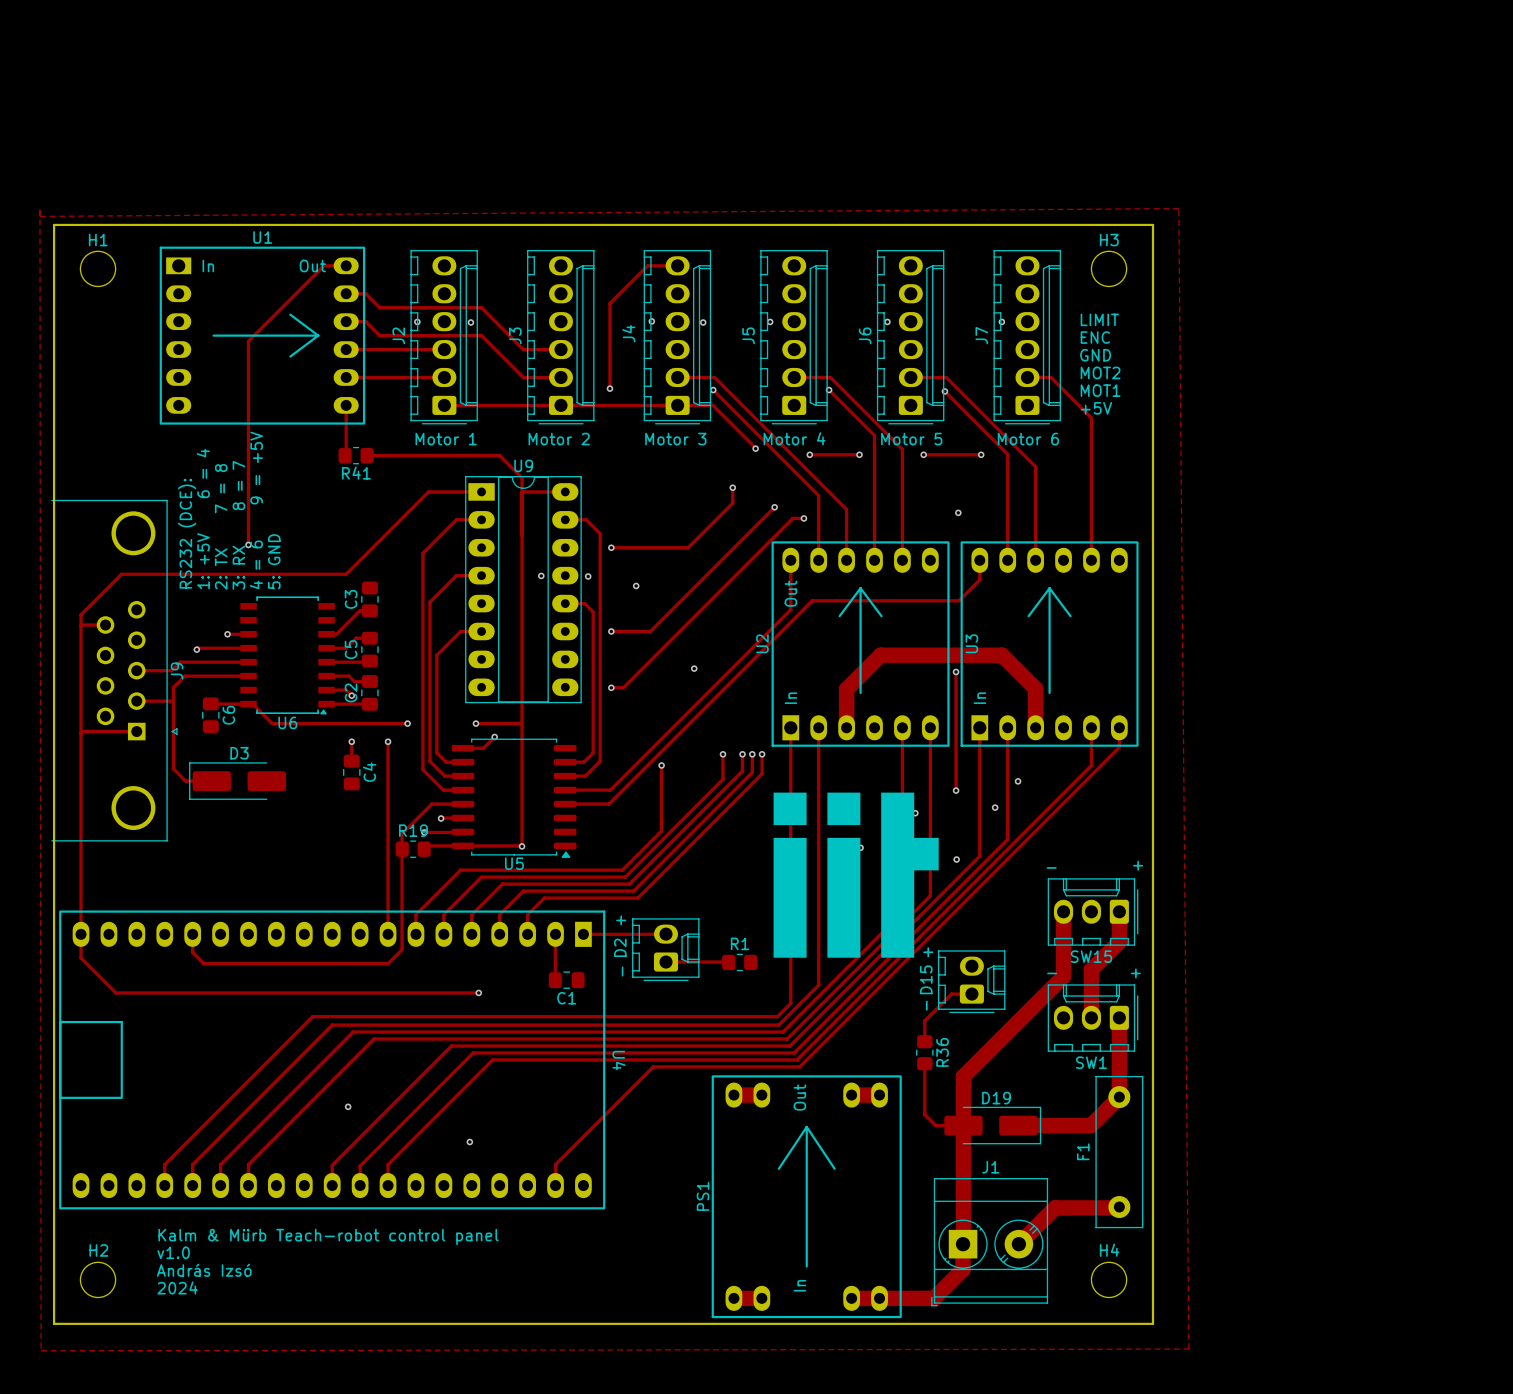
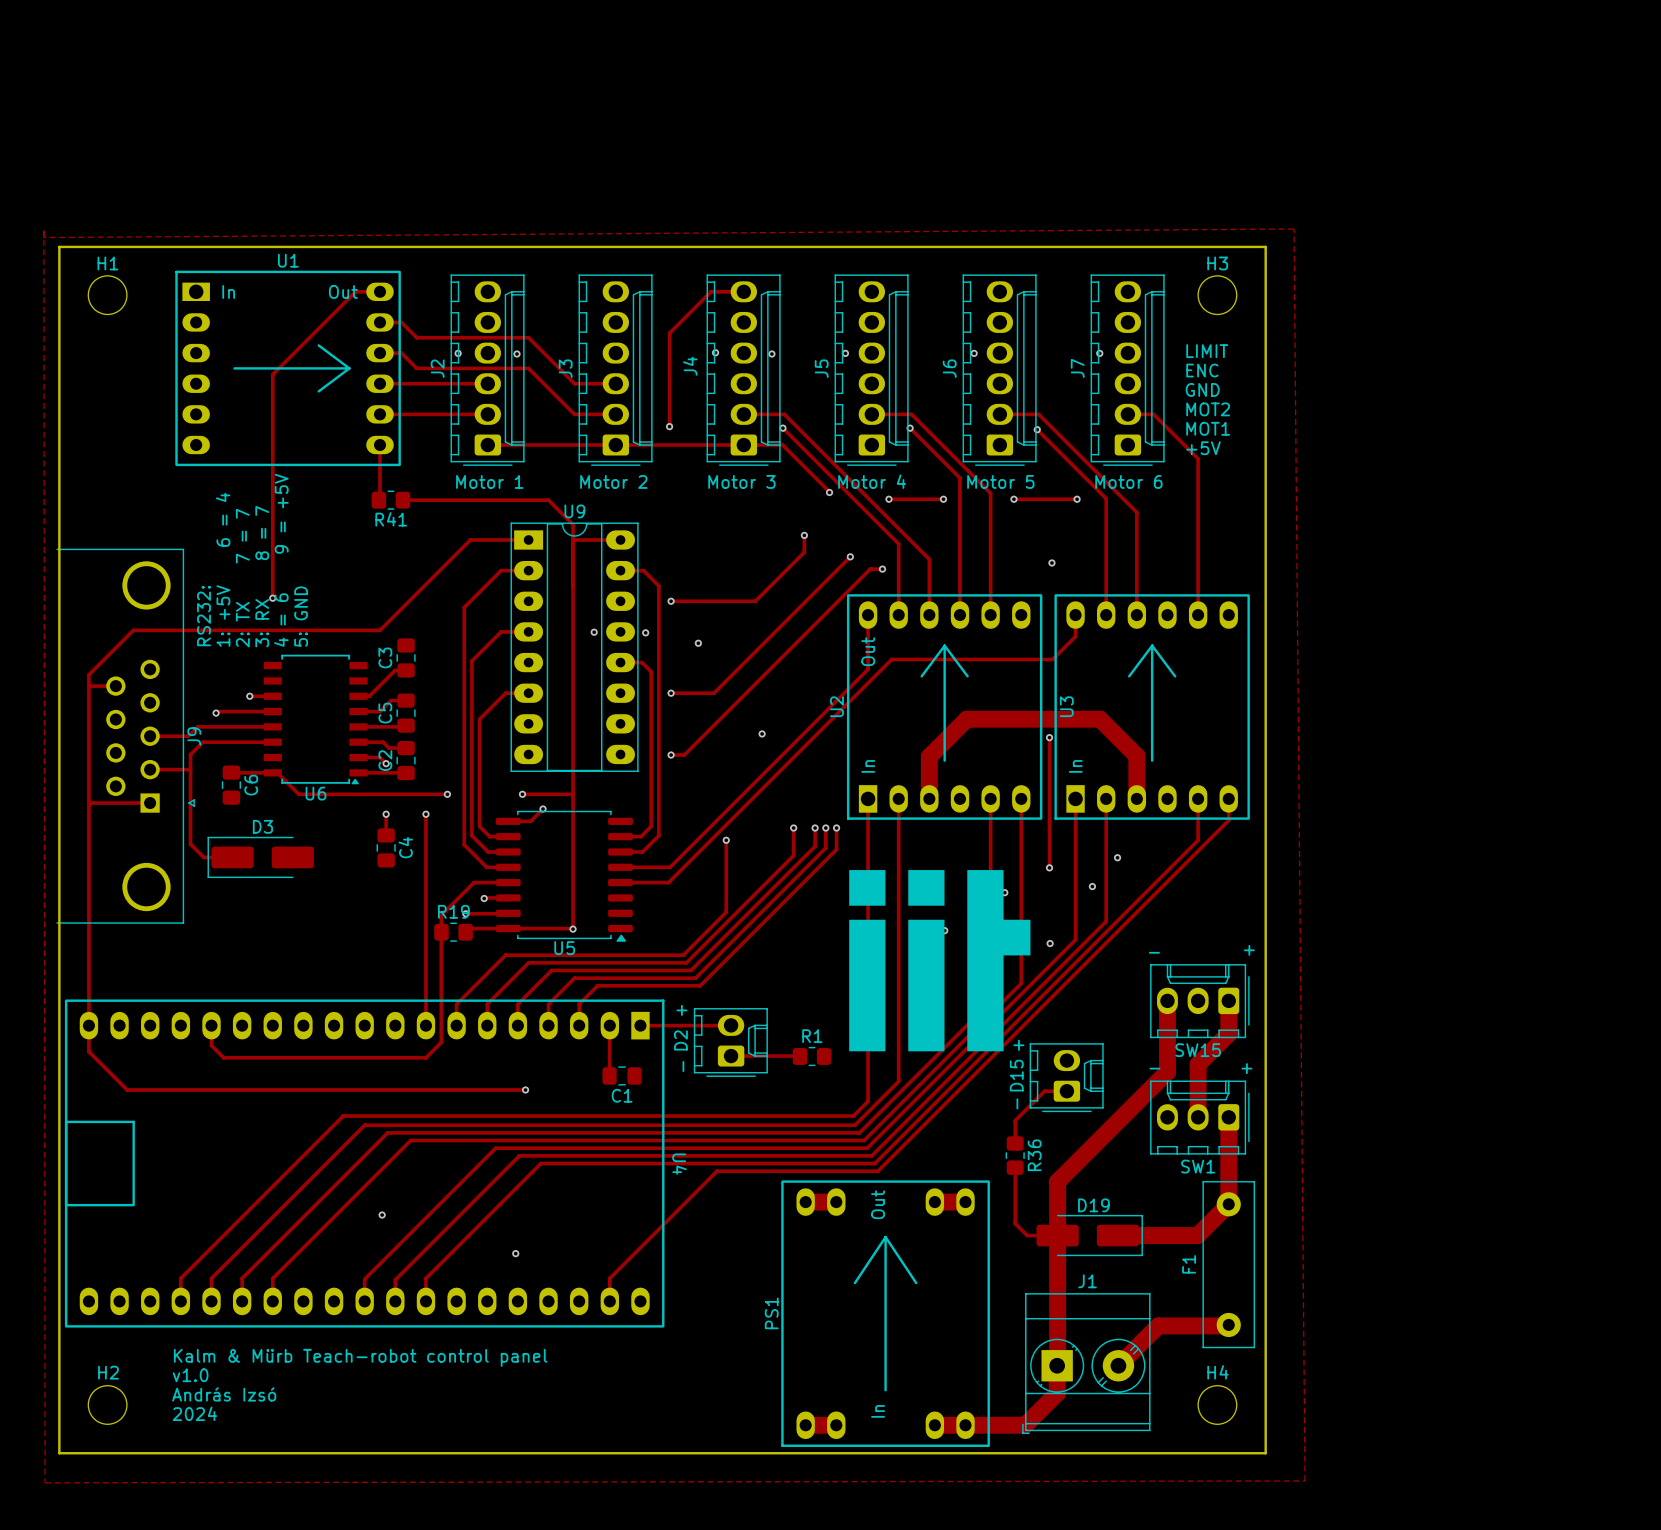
text: 2: TX 7 = 8 (221, 526) -> 2: TX 7 = 7 (242, 578)
text: RS232 (DCE): (187, 533) -> RS232: (204, 616)

